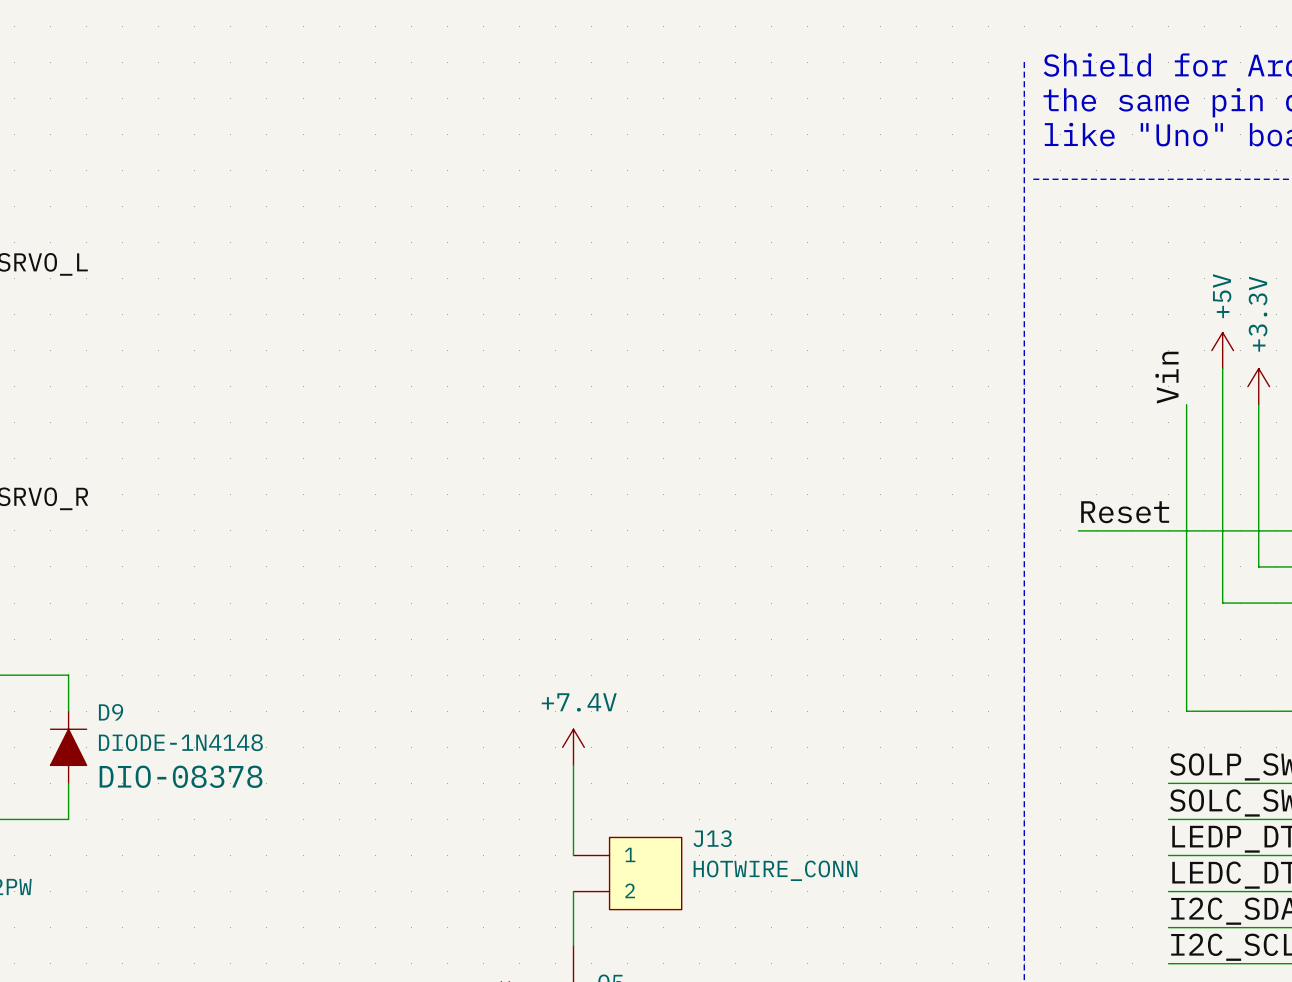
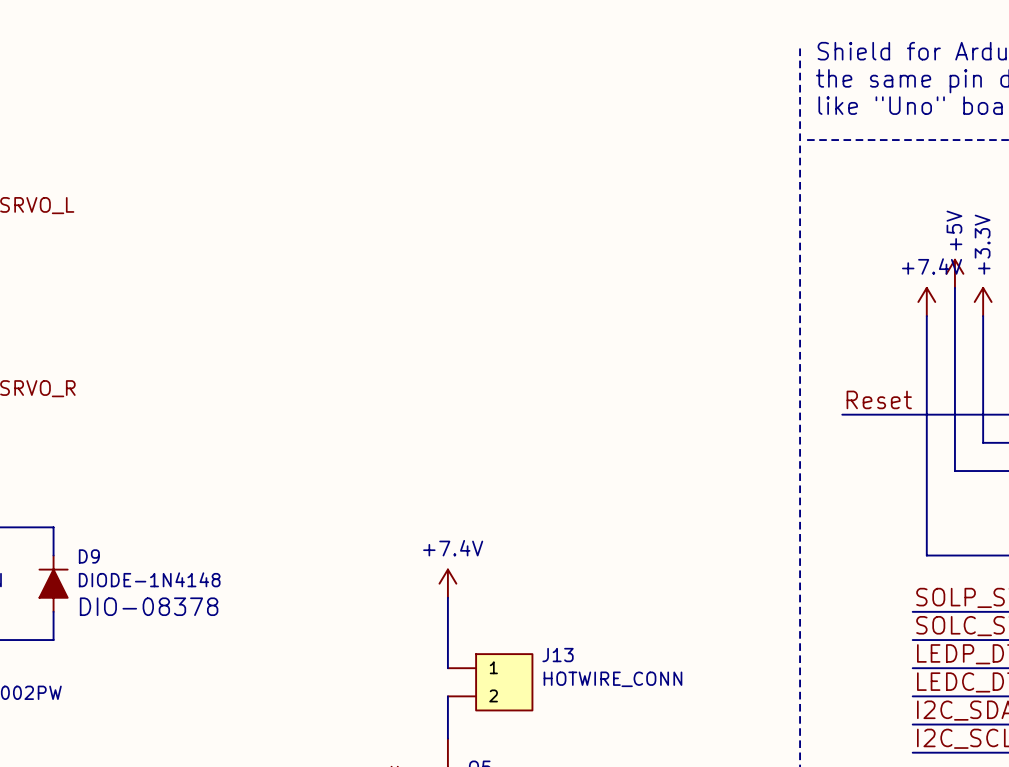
label: Vin (1166, 377) -> none
power symbol: none -> (926, 302)

